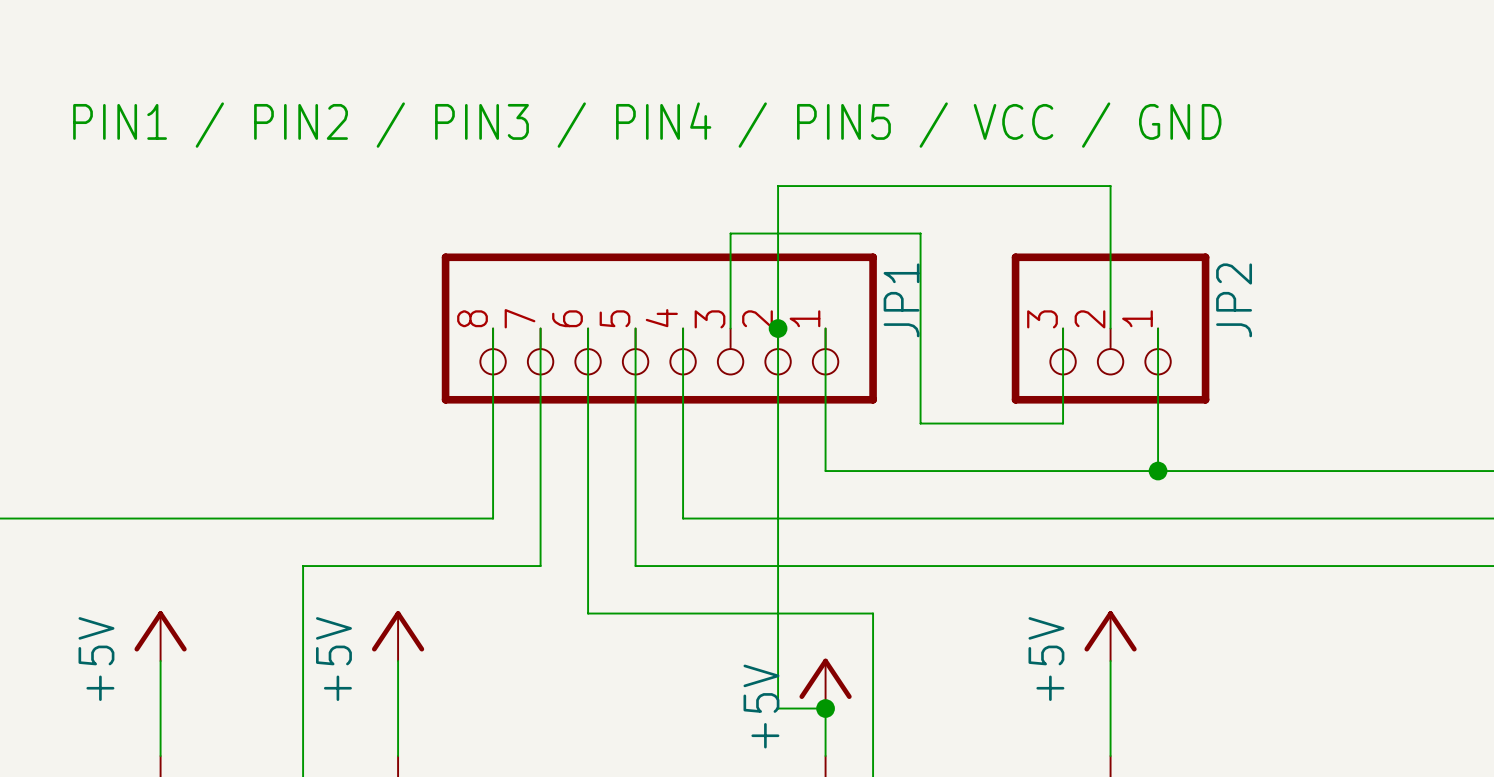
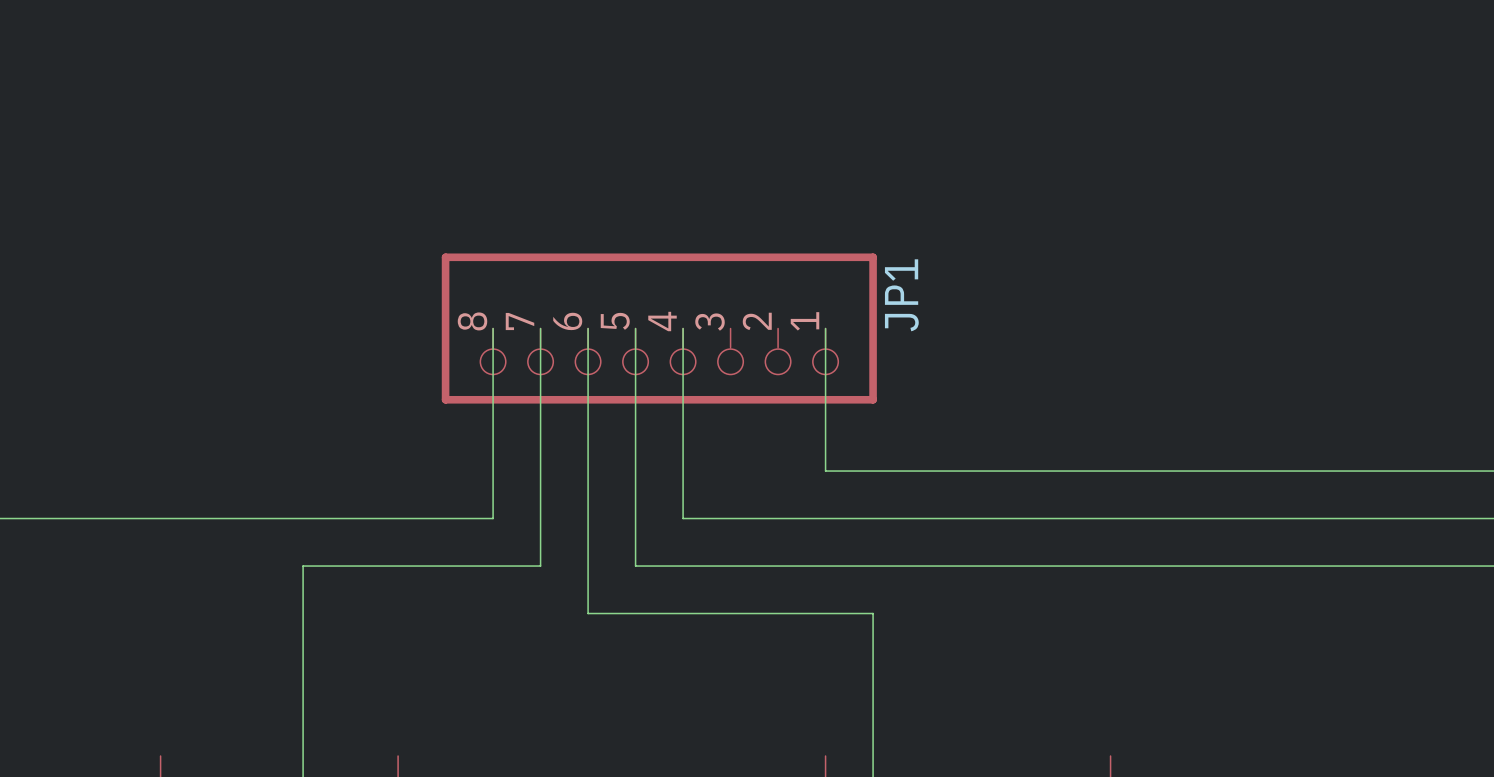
text: PIN1 / PIN2 / PIN3 / PIN4 / PIN5 / VCC / GND (647, 125) -> none
wire: (730, 328) (730, 233) (920, 233) (920, 423) (1063, 423) (1063, 328) -> none
junction: (778, 328) -> none
wire: (1110, 328) (1110, 186) (778, 186) (778, 708) (825, 708) (825, 756) -> none
JP2: (1110, 328) -> none
wire: (1158, 328) (1158, 471) -> none
junction: (1158, 471) -> none
power symbol: +5V (160, 636) -> none
power symbol: +5V (398, 636) -> none
power symbol: +5V (1110, 636) -> none
wire: (160, 661) (160, 756) -> none
wire: (398, 661) (398, 756) -> none
wire: (1110, 661) (1110, 756) -> none
power symbol: +5V (825, 683) -> none
junction: (825, 708) -> none

